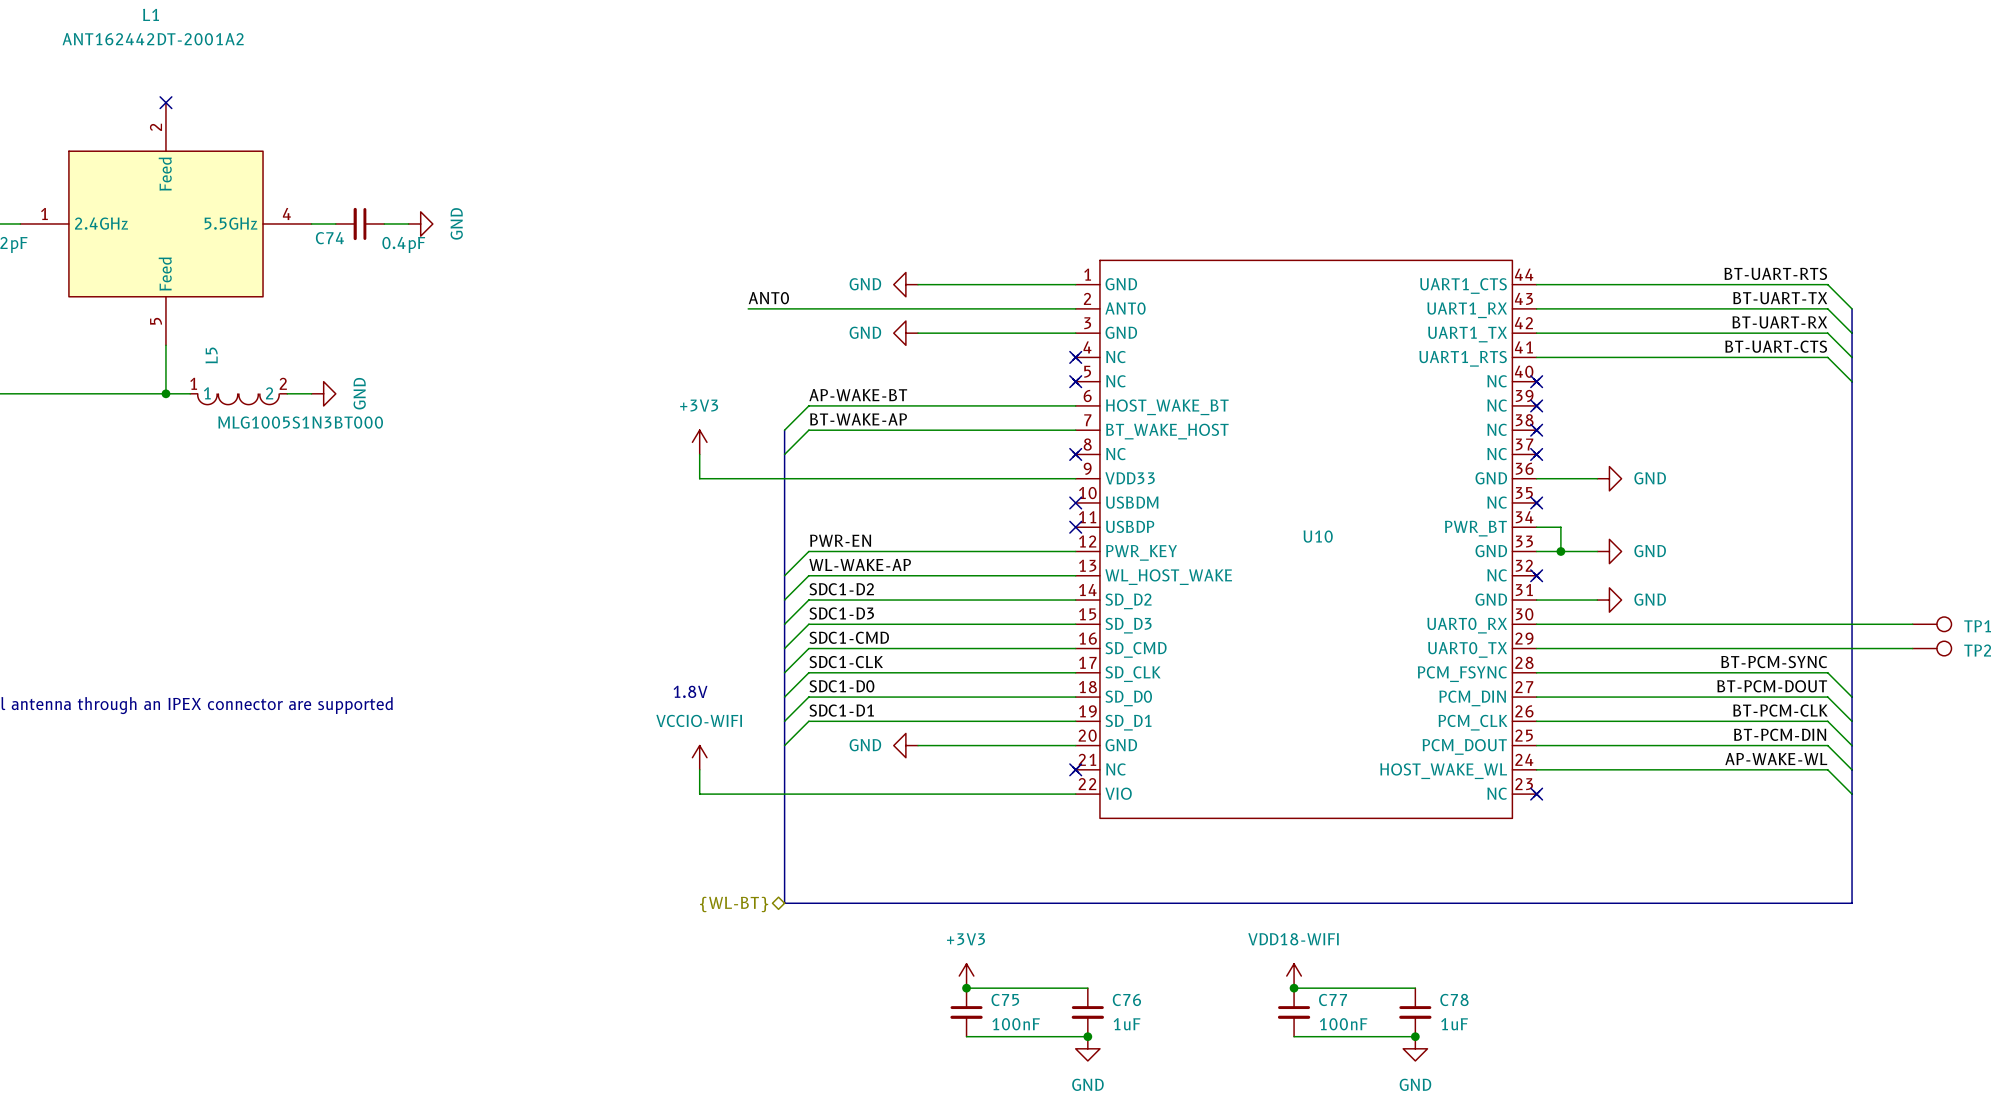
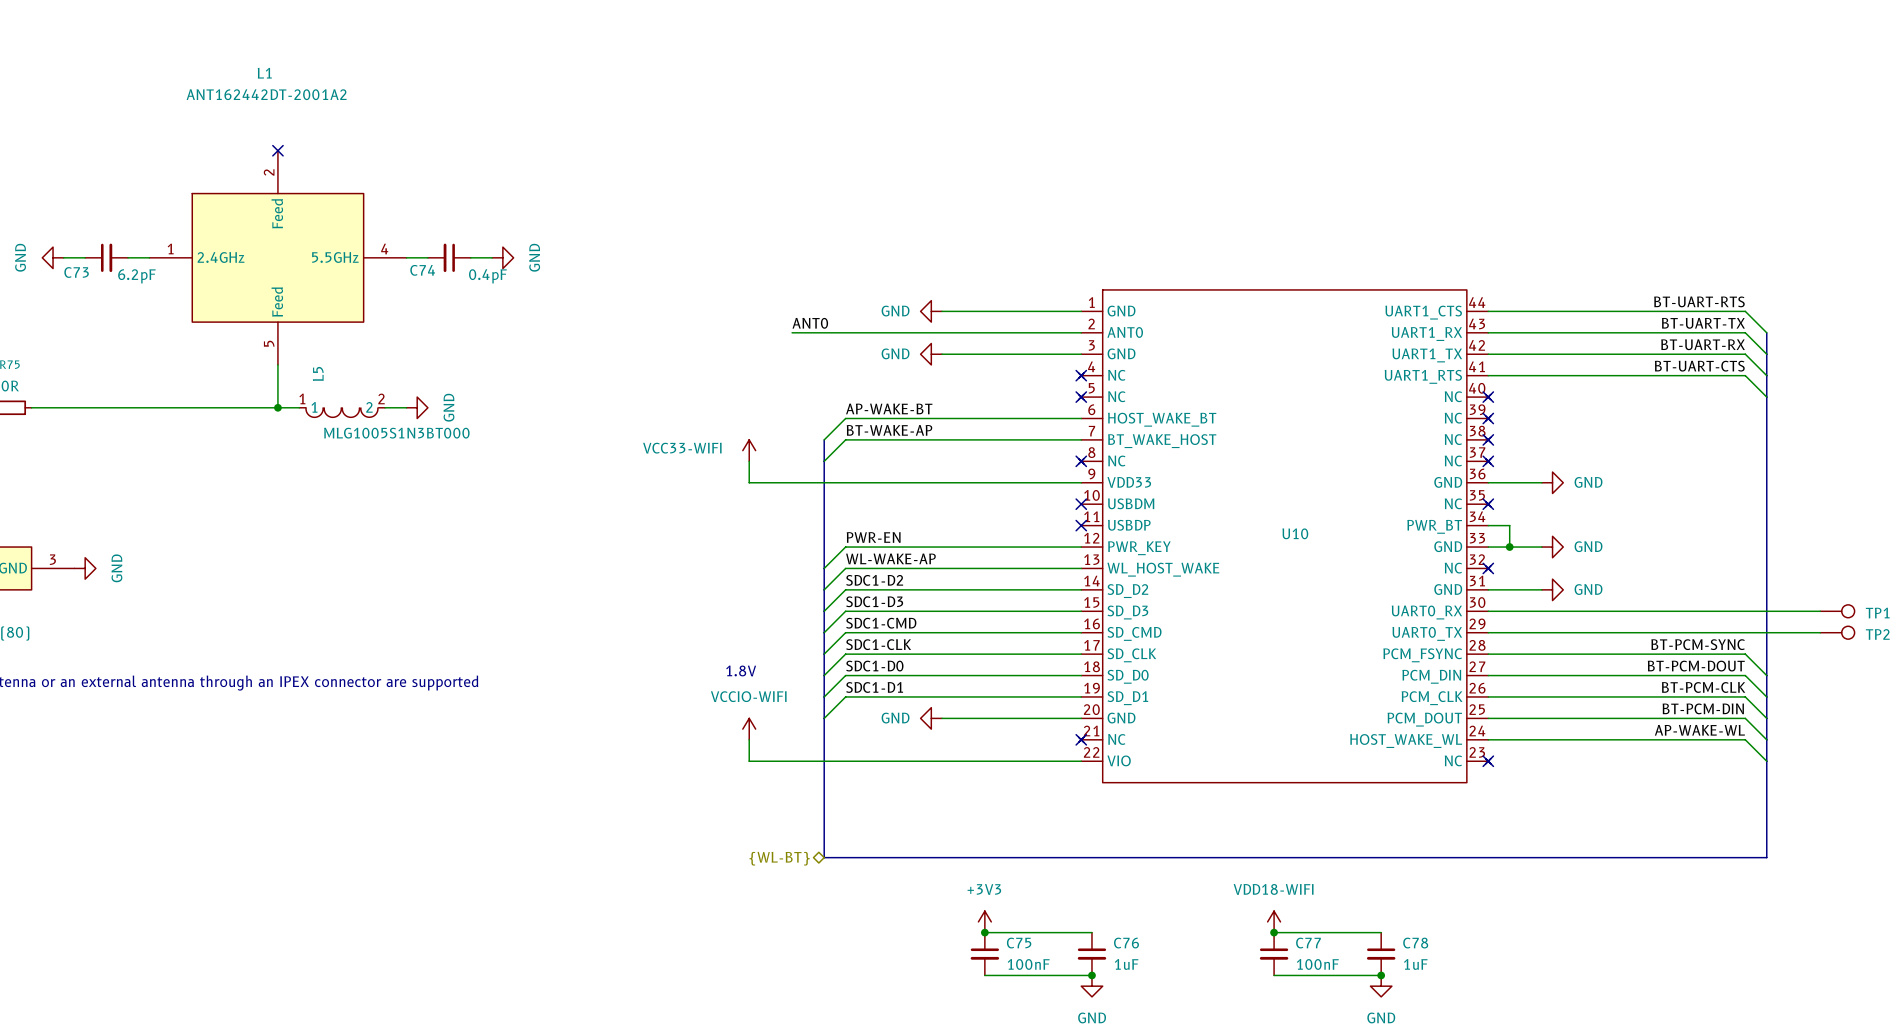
power symbol: +3V3 (699, 442) -> VCC33-WIFI (749, 450)

